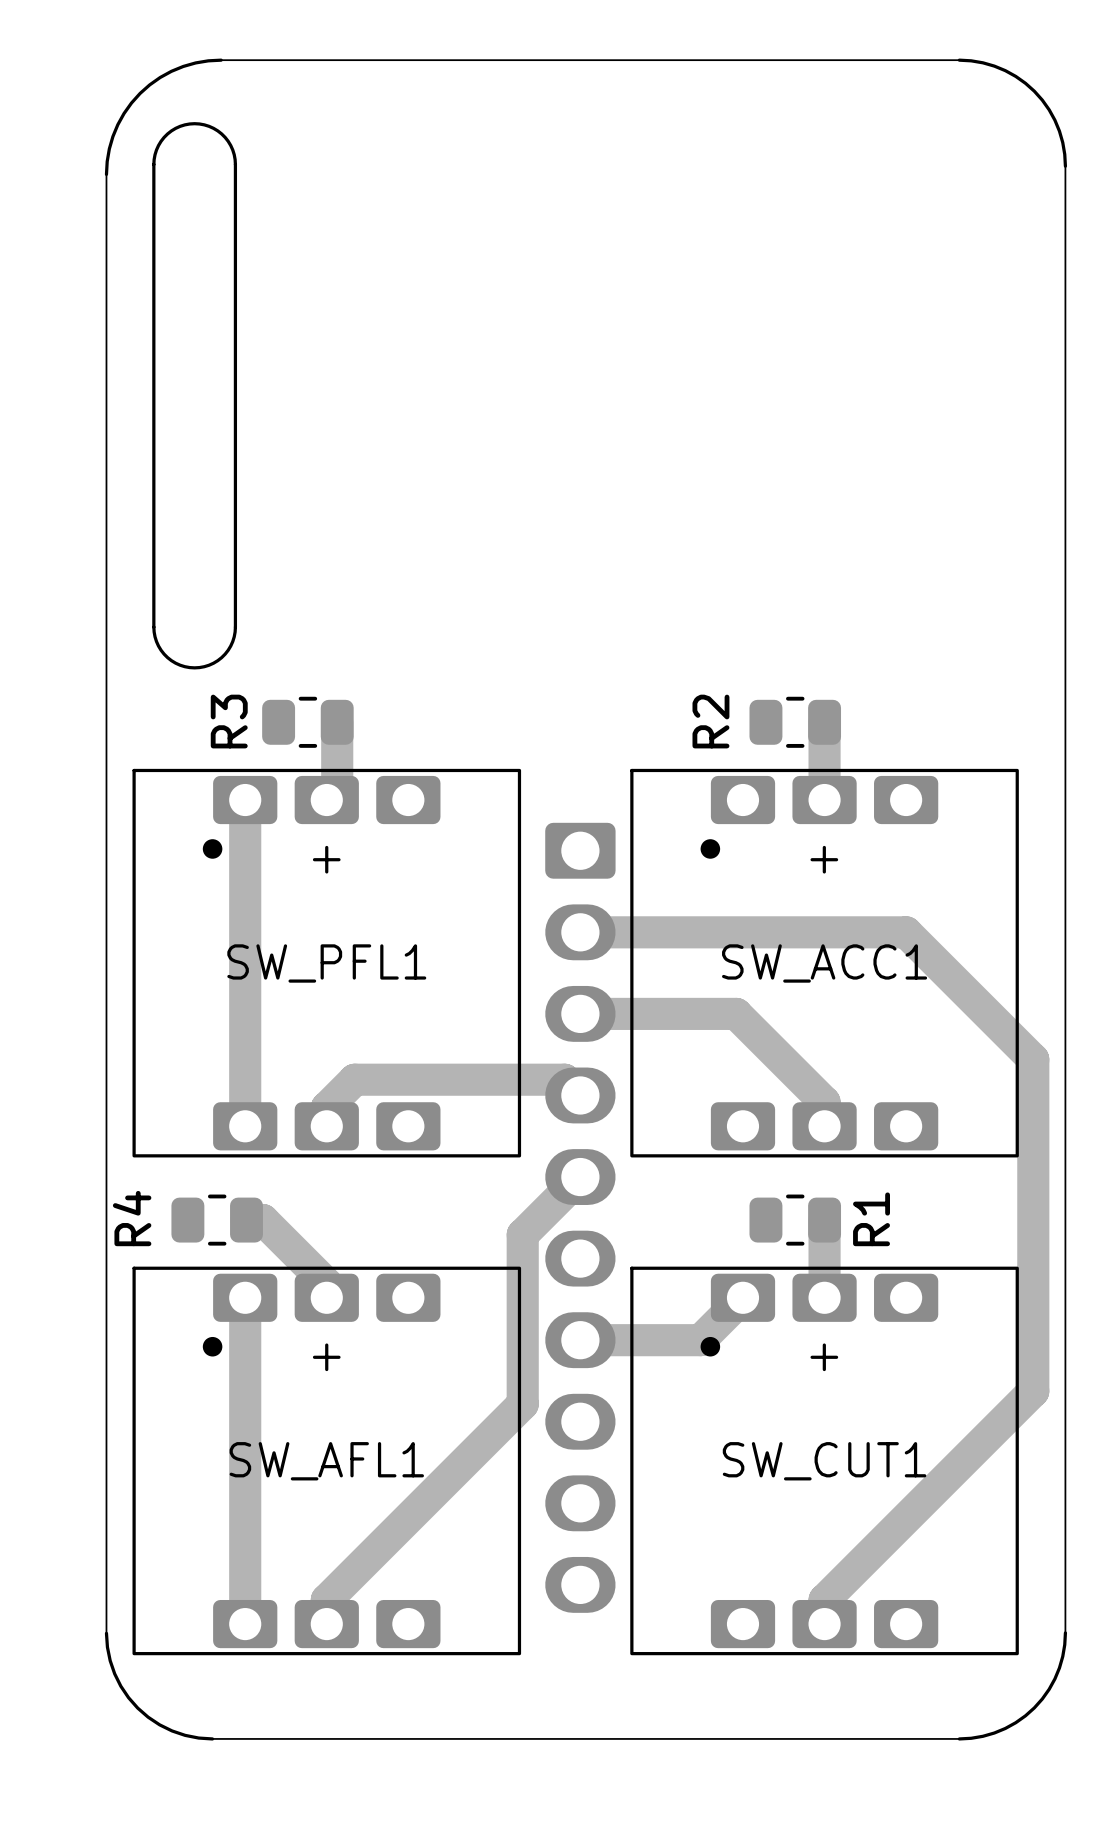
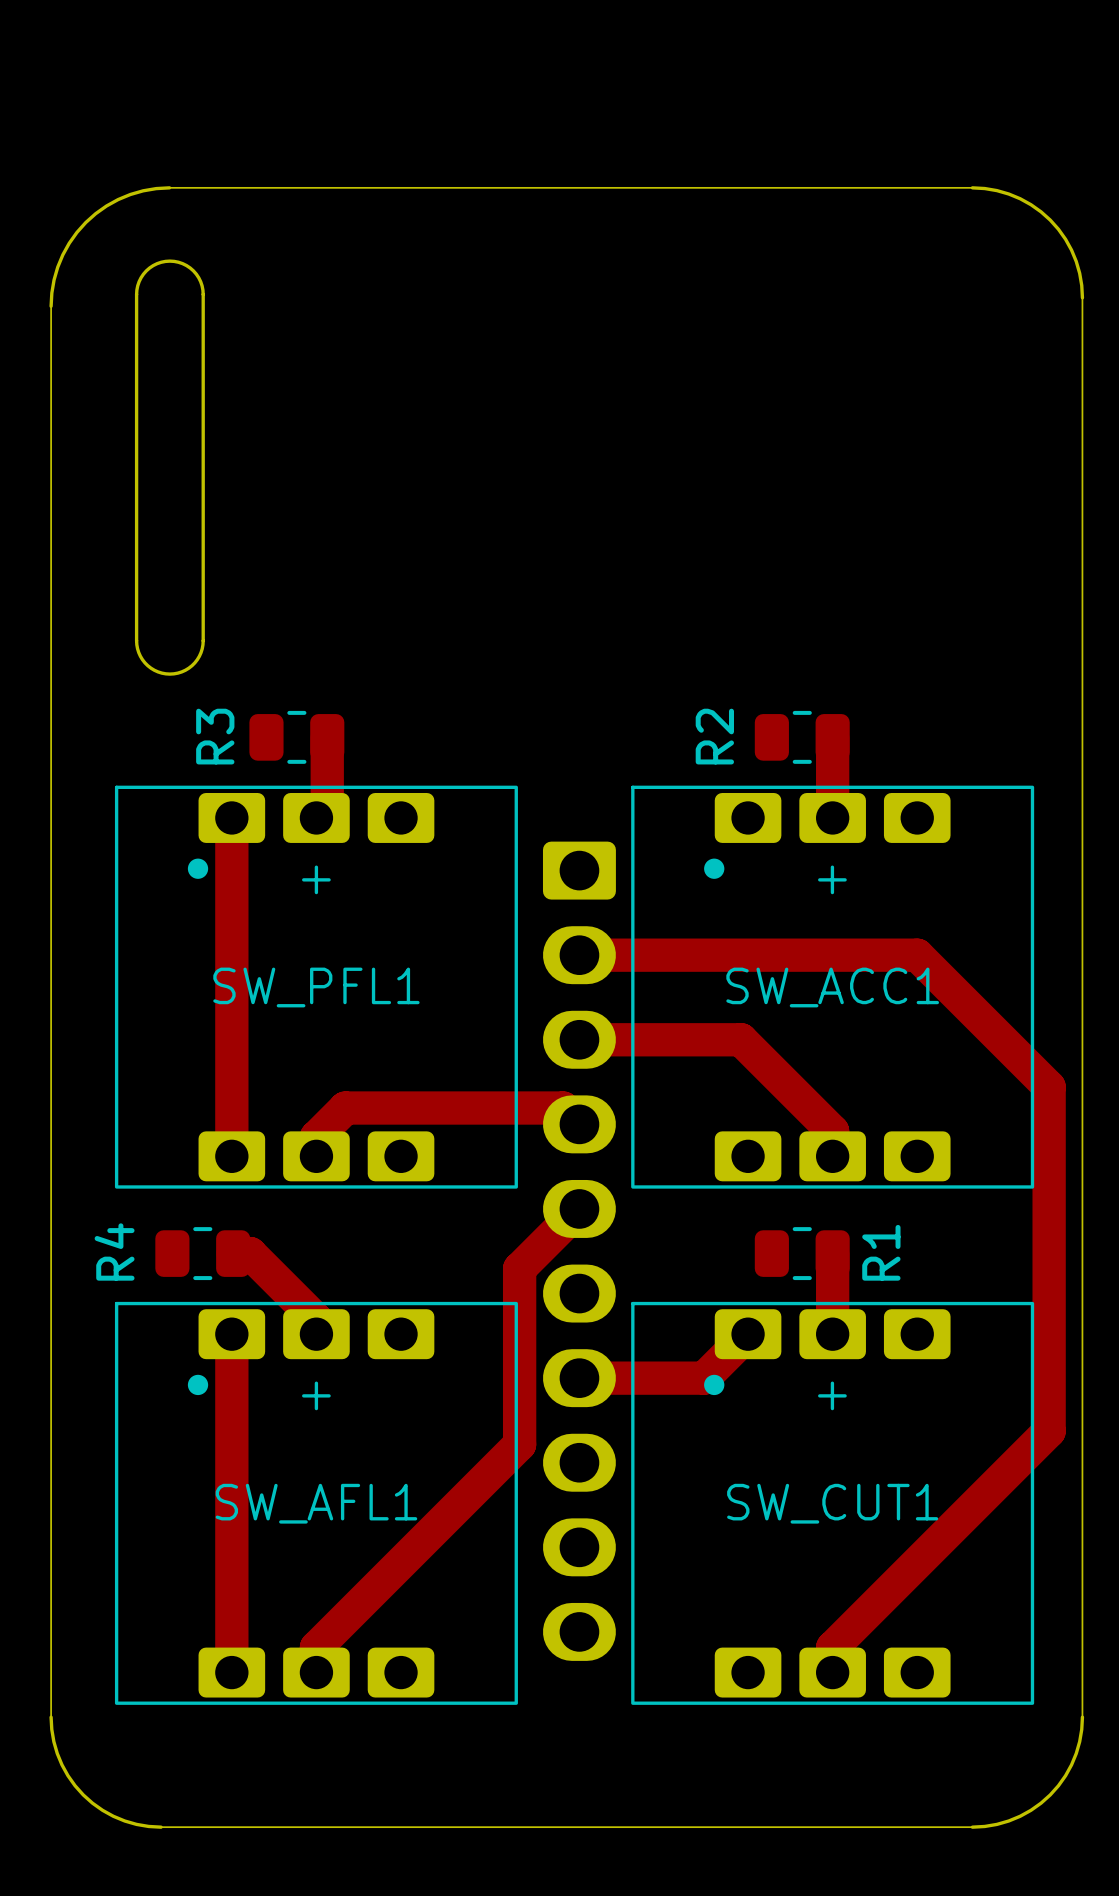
board edge: (153, 164) (154, 632) (161, 650) (171, 660) (184, 666) (199, 667) (213, 663) (225, 654) (232, 641) (235, 632) (235, 159) (230, 145) (221, 133) (209, 126) (189, 123) (175, 128) (164, 137) (156, 150) (153, 164) -> (136, 294) (136, 644) (140, 656) (150, 668) (161, 673) (173, 673) (191, 665) (199, 656) (202, 644) (202, 290) (198, 277) (190, 268) (178, 262) (165, 261) (153, 265) (143, 274) (139, 281) (136, 294)
board edge: (1065, 298) (1065, 166) (1059, 131) (1042, 100) (1025, 83) (1005, 70) (971, 60) (208, 60) (171, 71) (140, 93) (117, 124) (107, 161) (106, 1633) (110, 1660) (120, 1686) (137, 1708) (159, 1724) (185, 1735) (212, 1738) (971, 1738) (1005, 1728) (1034, 1707) (1049, 1689) (1059, 1667) (1065, 1632) -> (1082, 297) (1079, 273) (1071, 250) (1050, 220) (1020, 198) (984, 188) (169, 187) (143, 190) (118, 199) (95, 213) (76, 232) (57, 267) (51, 306) (51, 1717) (53, 1741) (61, 1764) (83, 1794) (113, 1816) (148, 1826) (972, 1827) (996, 1824) (1020, 1816) (1041, 1803) (1058, 1785) (1071, 1764) (1079, 1741) (1082, 1717) (1082, 1681)

